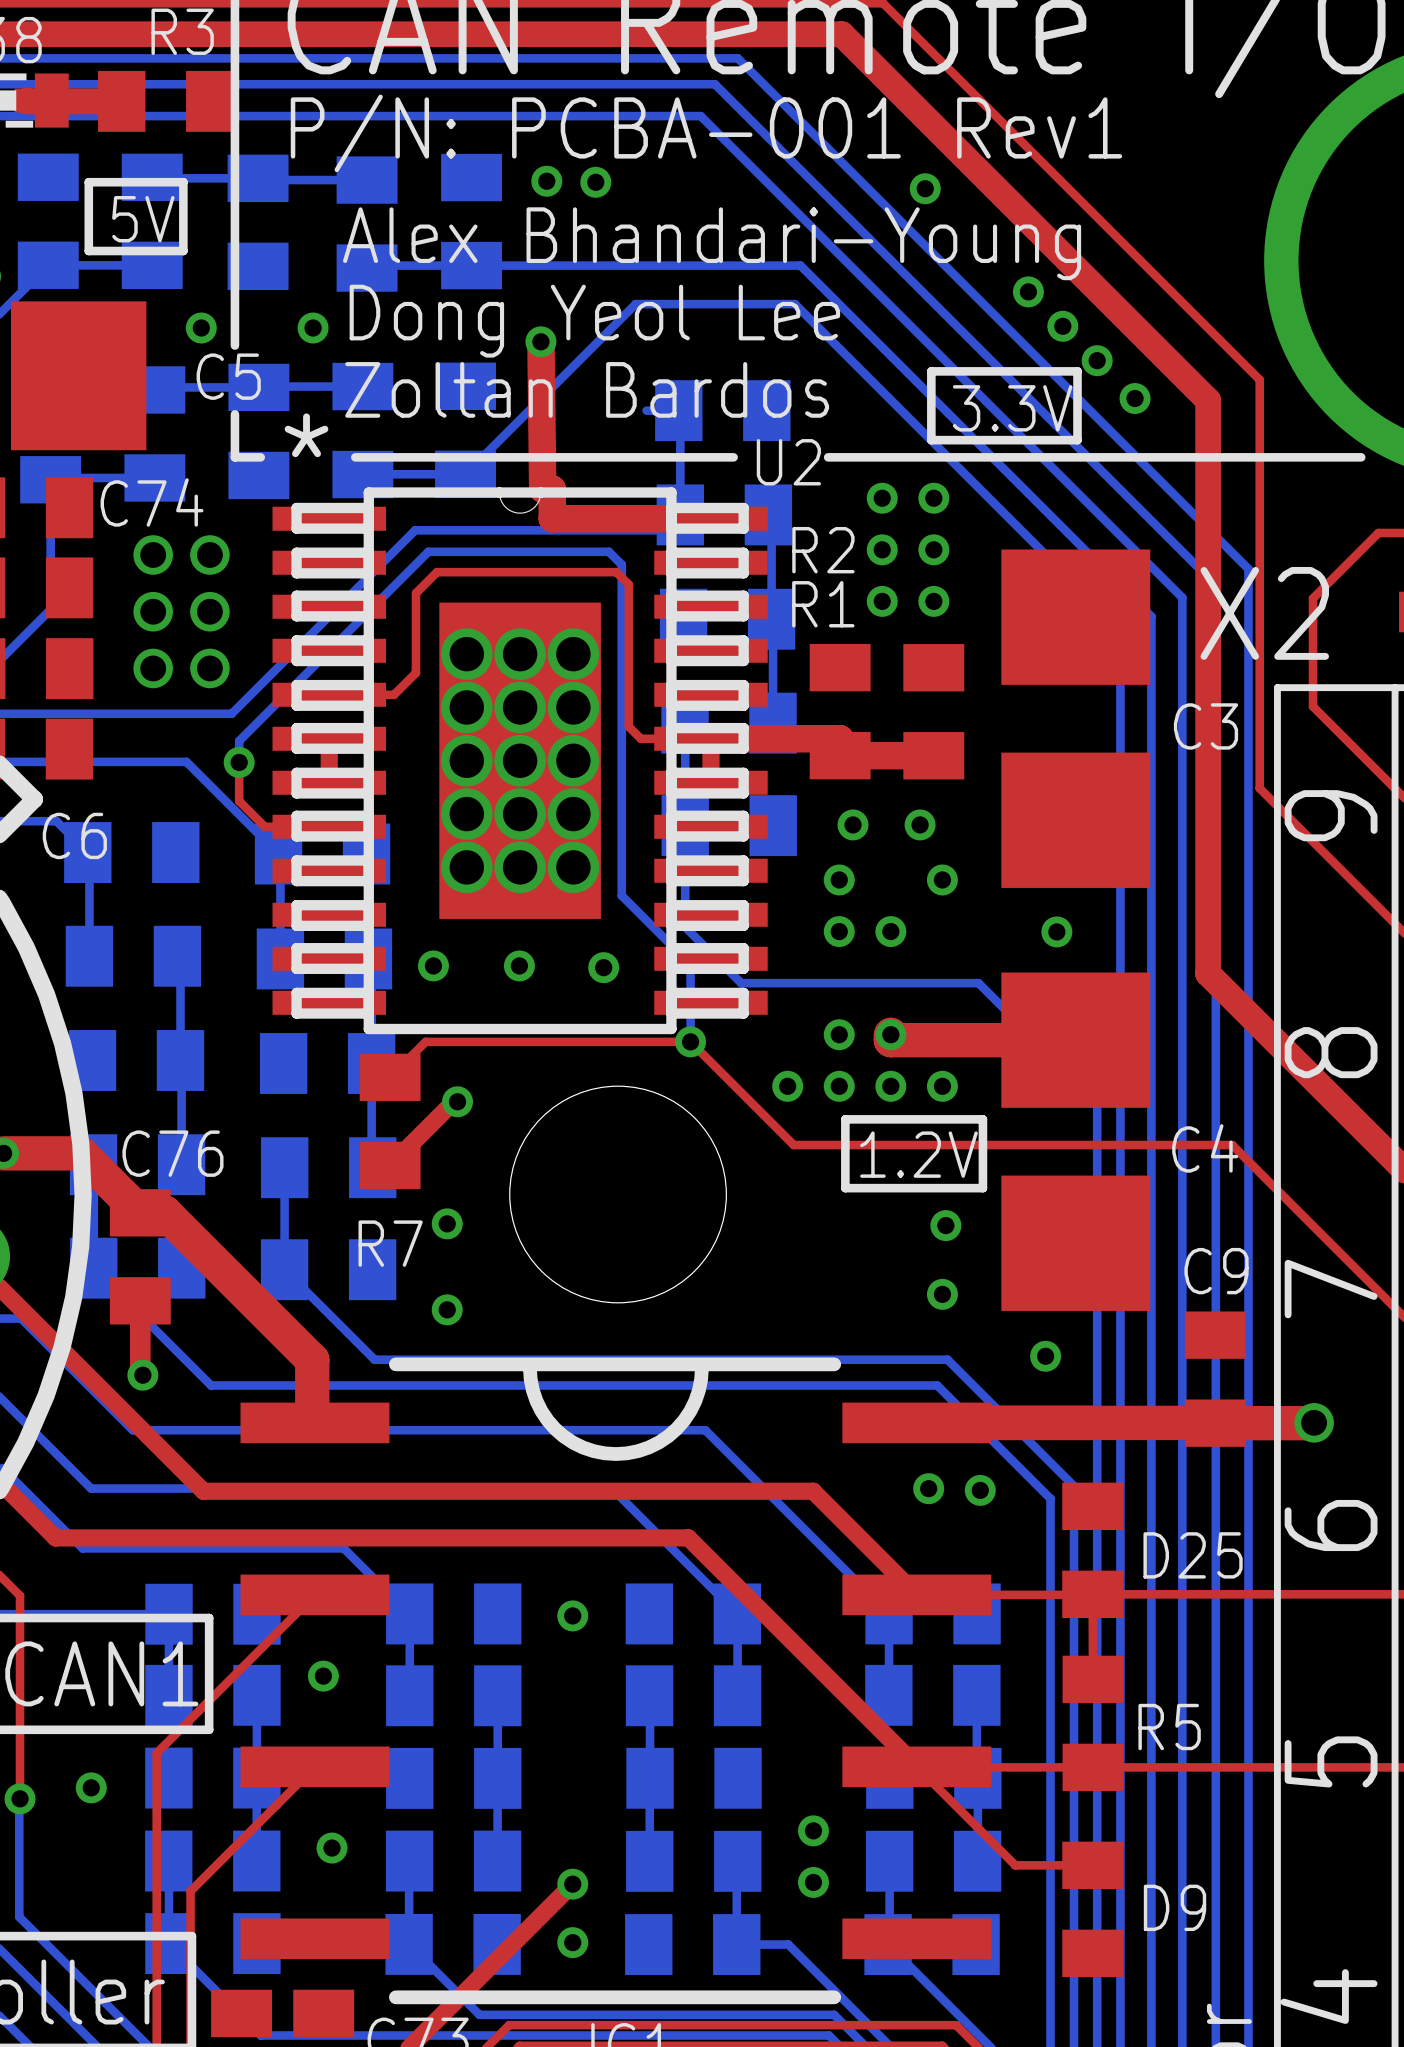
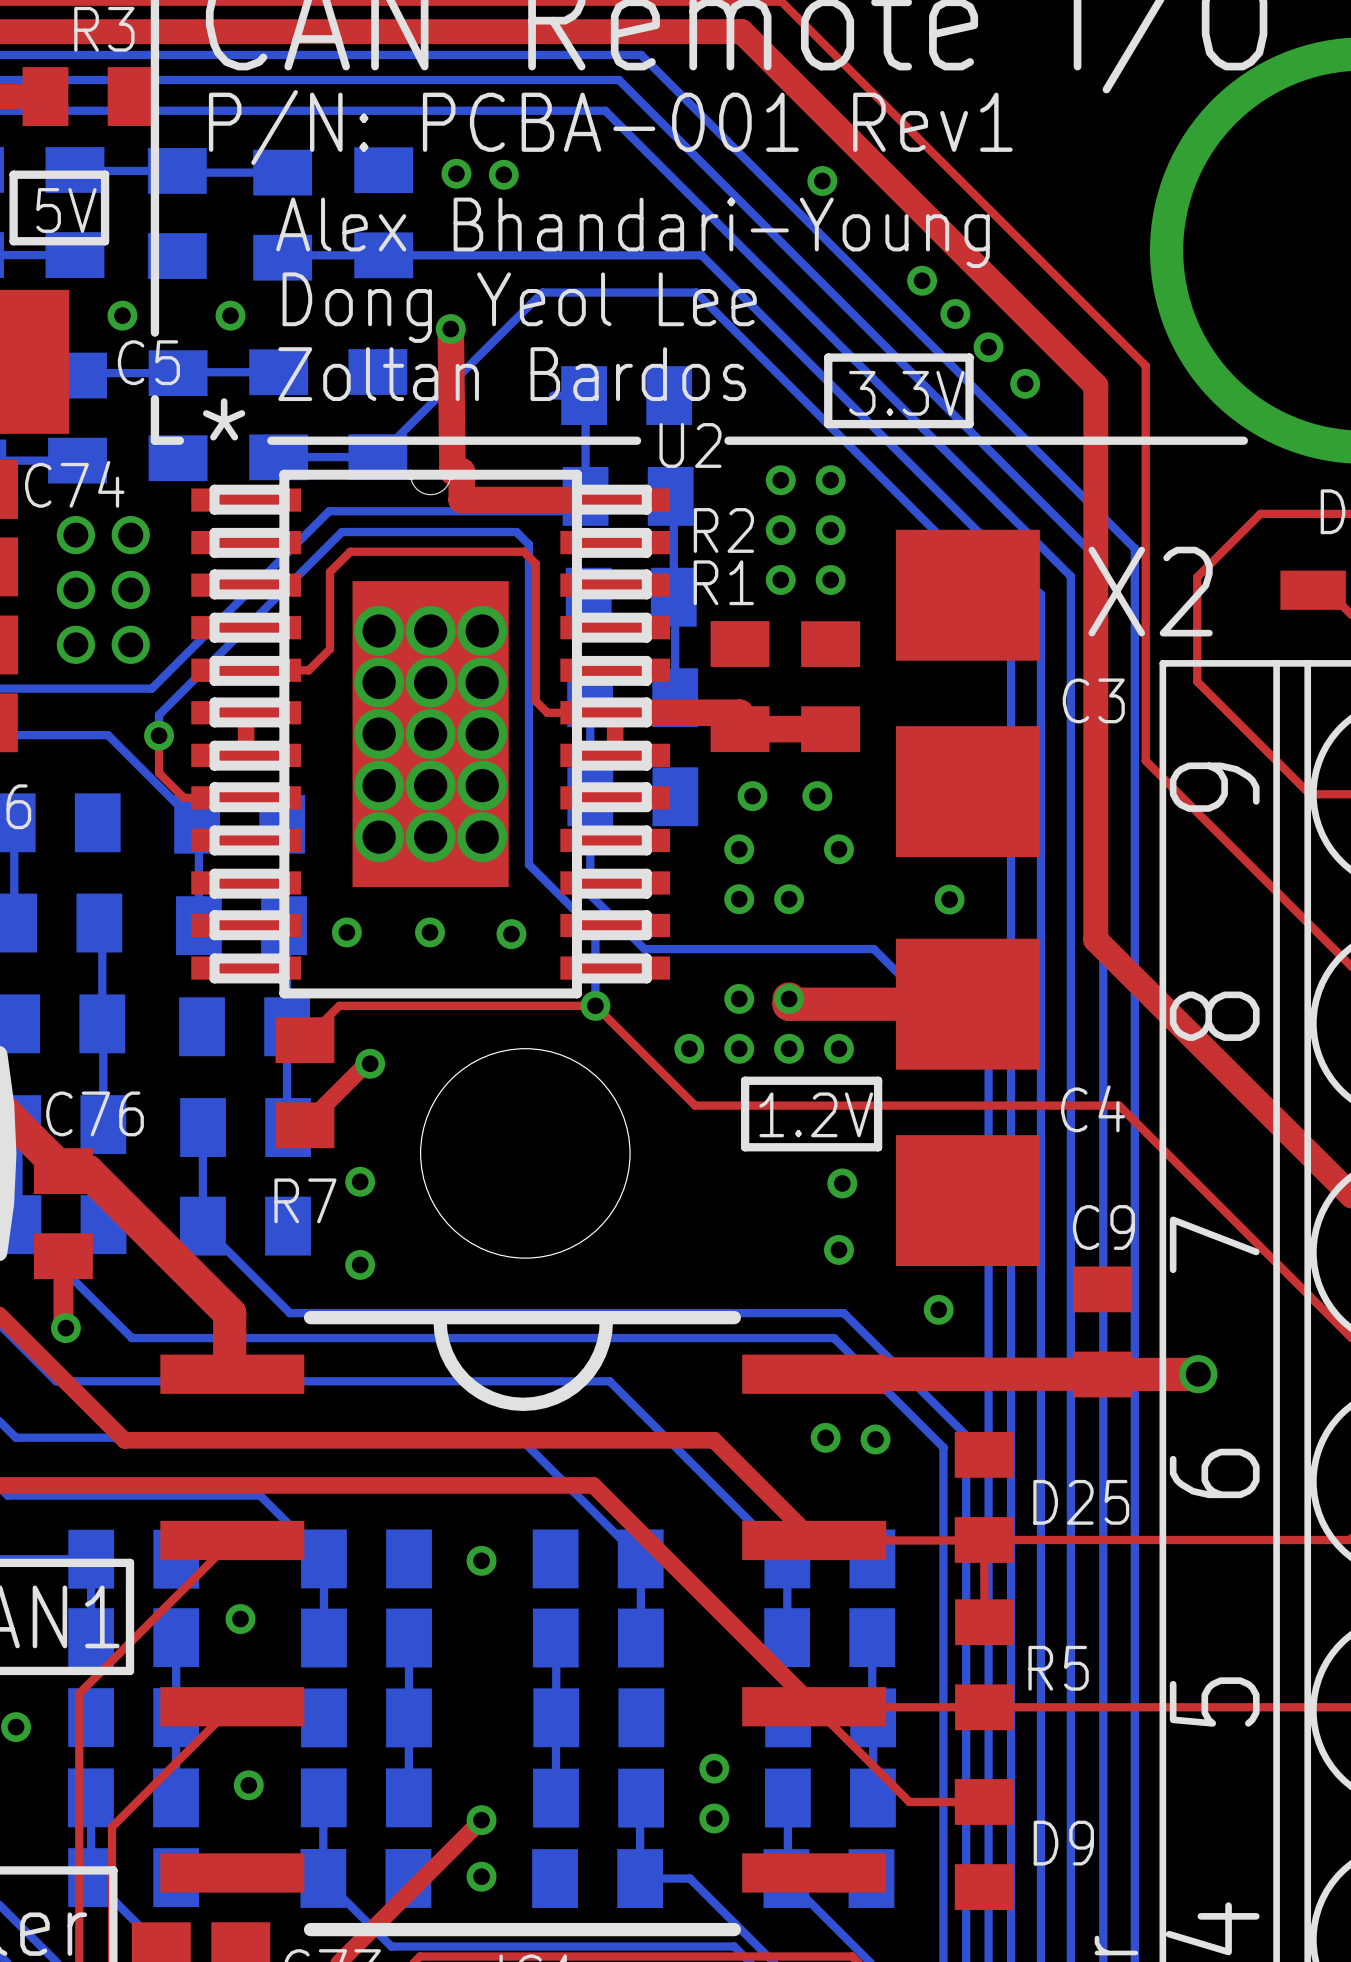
text position: Alex Bhandari-Young (712, 243) -> Alex Bhandari-Young (632, 232)
text position: Dong Yeol Lee (594, 321) -> Dong Yeol Lee (519, 307)
text position: Zoltan Bardos (587, 389) -> Zoltan Bardos (512, 374)

